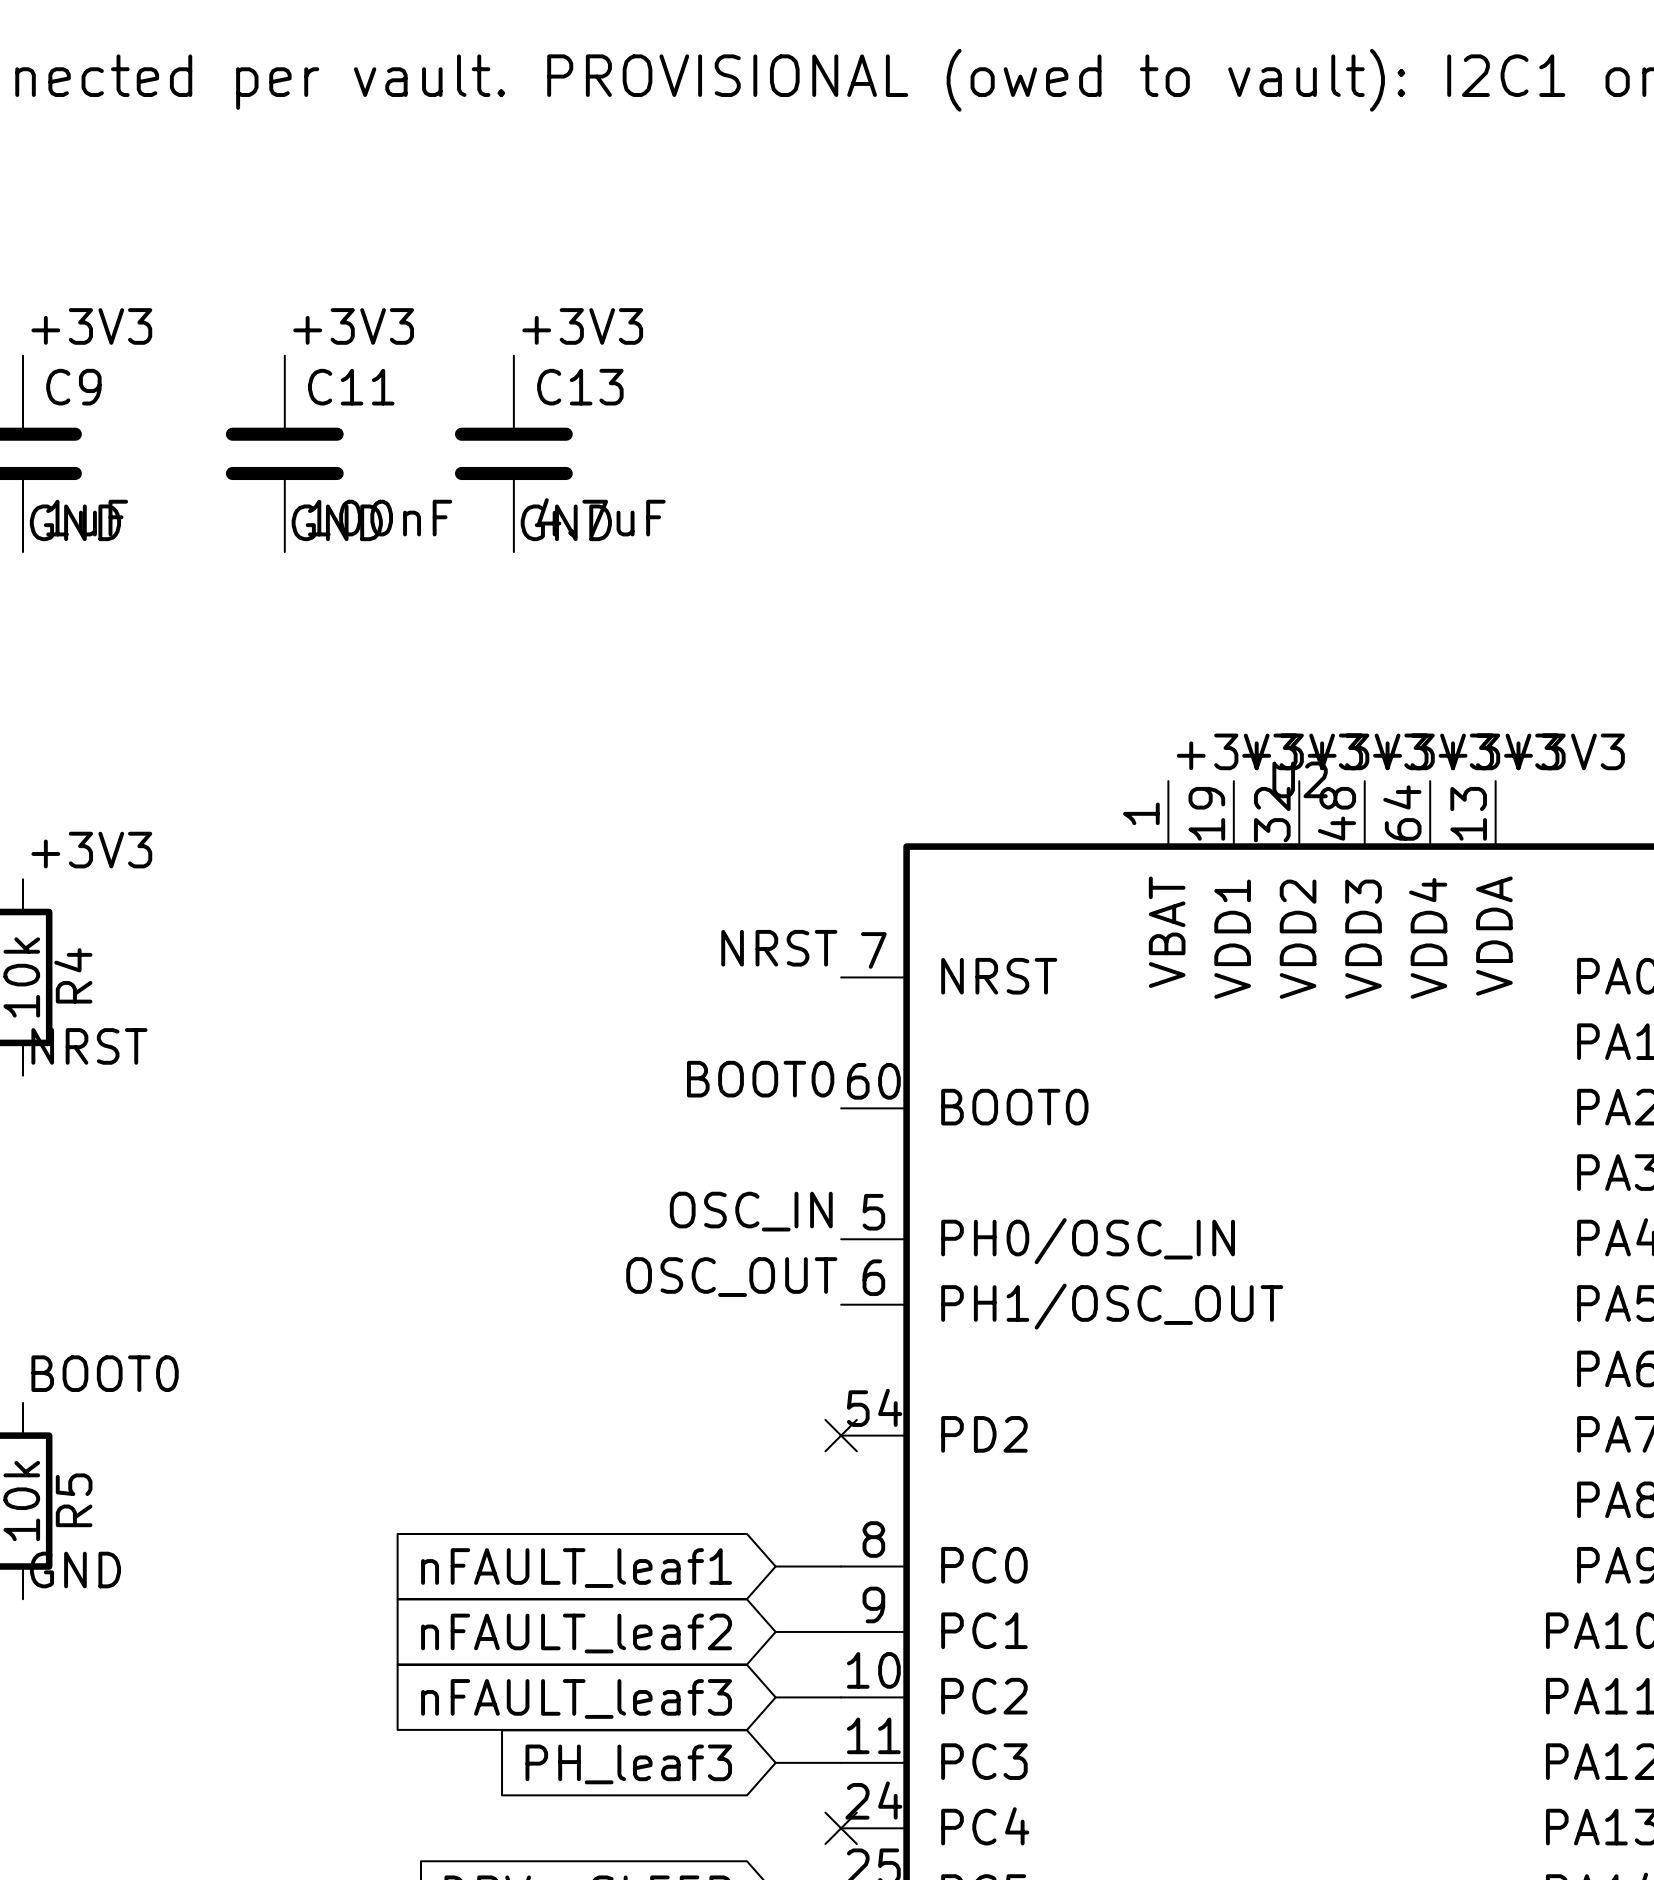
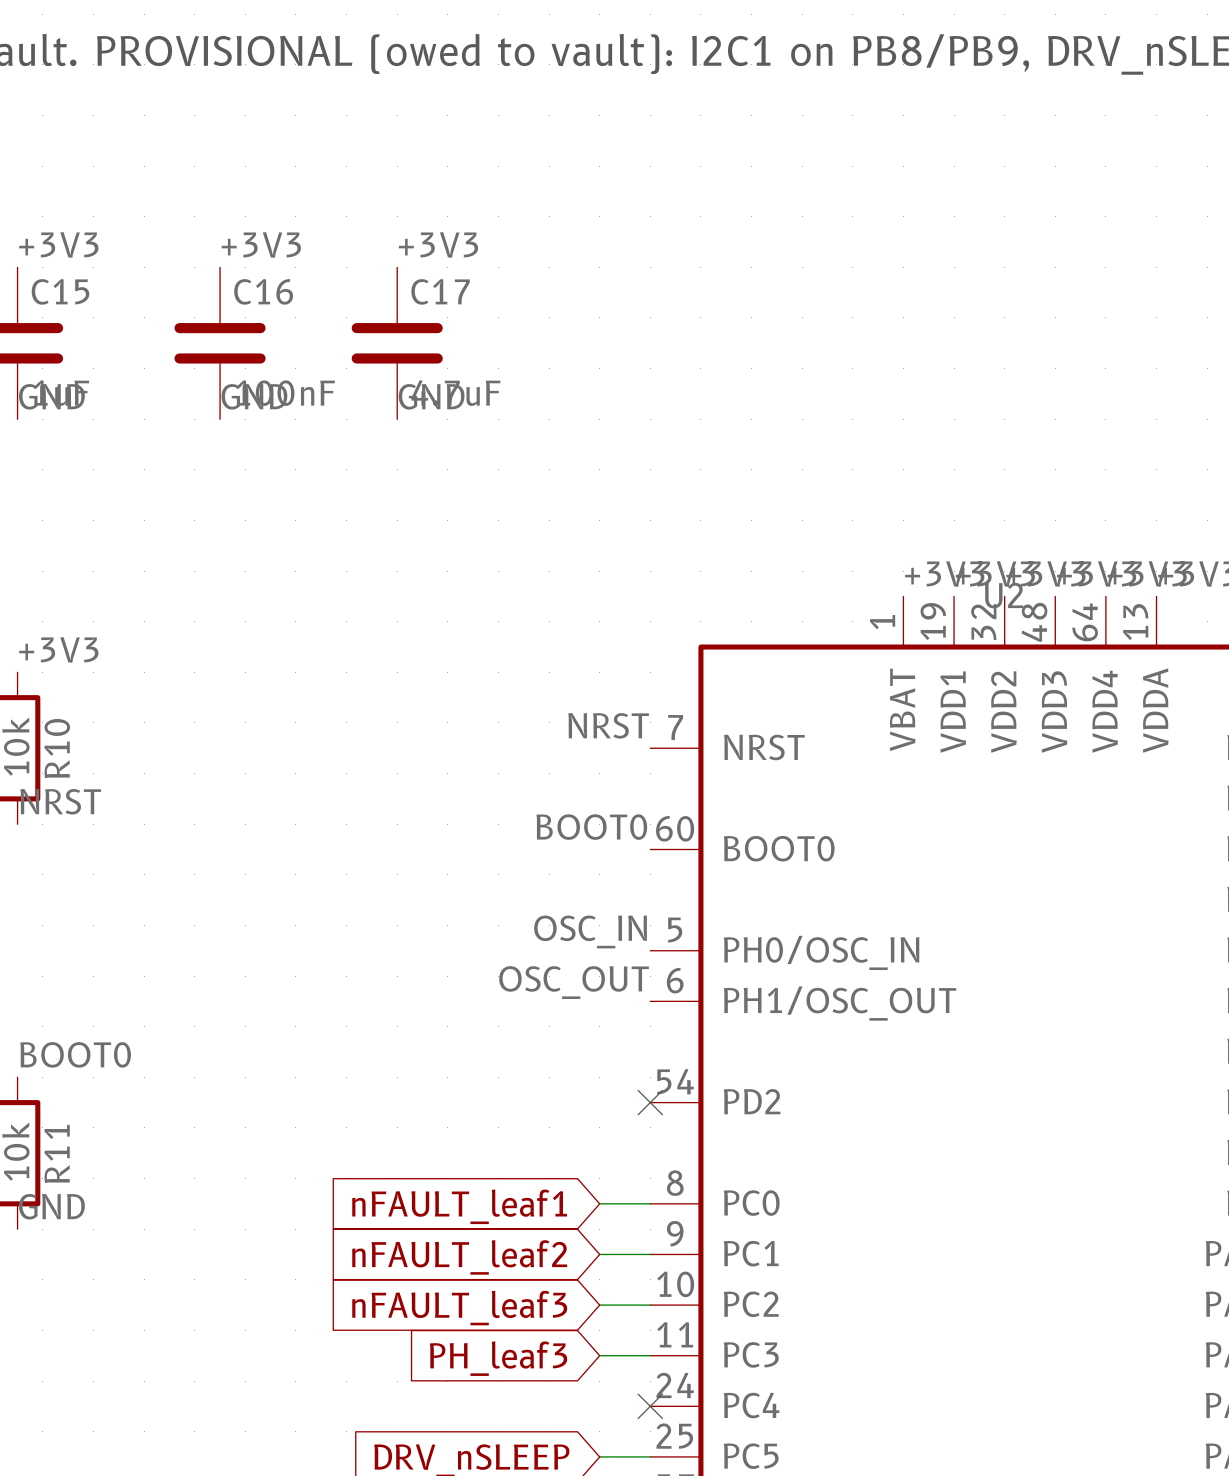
C9 name: C9 (73, 387) -> C15 (60, 291)
C11 name: C11 (351, 387) -> C16 (263, 291)
C13 name: C13 (580, 387) -> C17 (440, 291)
R4 name: R4 (73, 975) -> R10 (57, 748)
R5 name: R5 (74, 1500) -> R11 (57, 1154)

